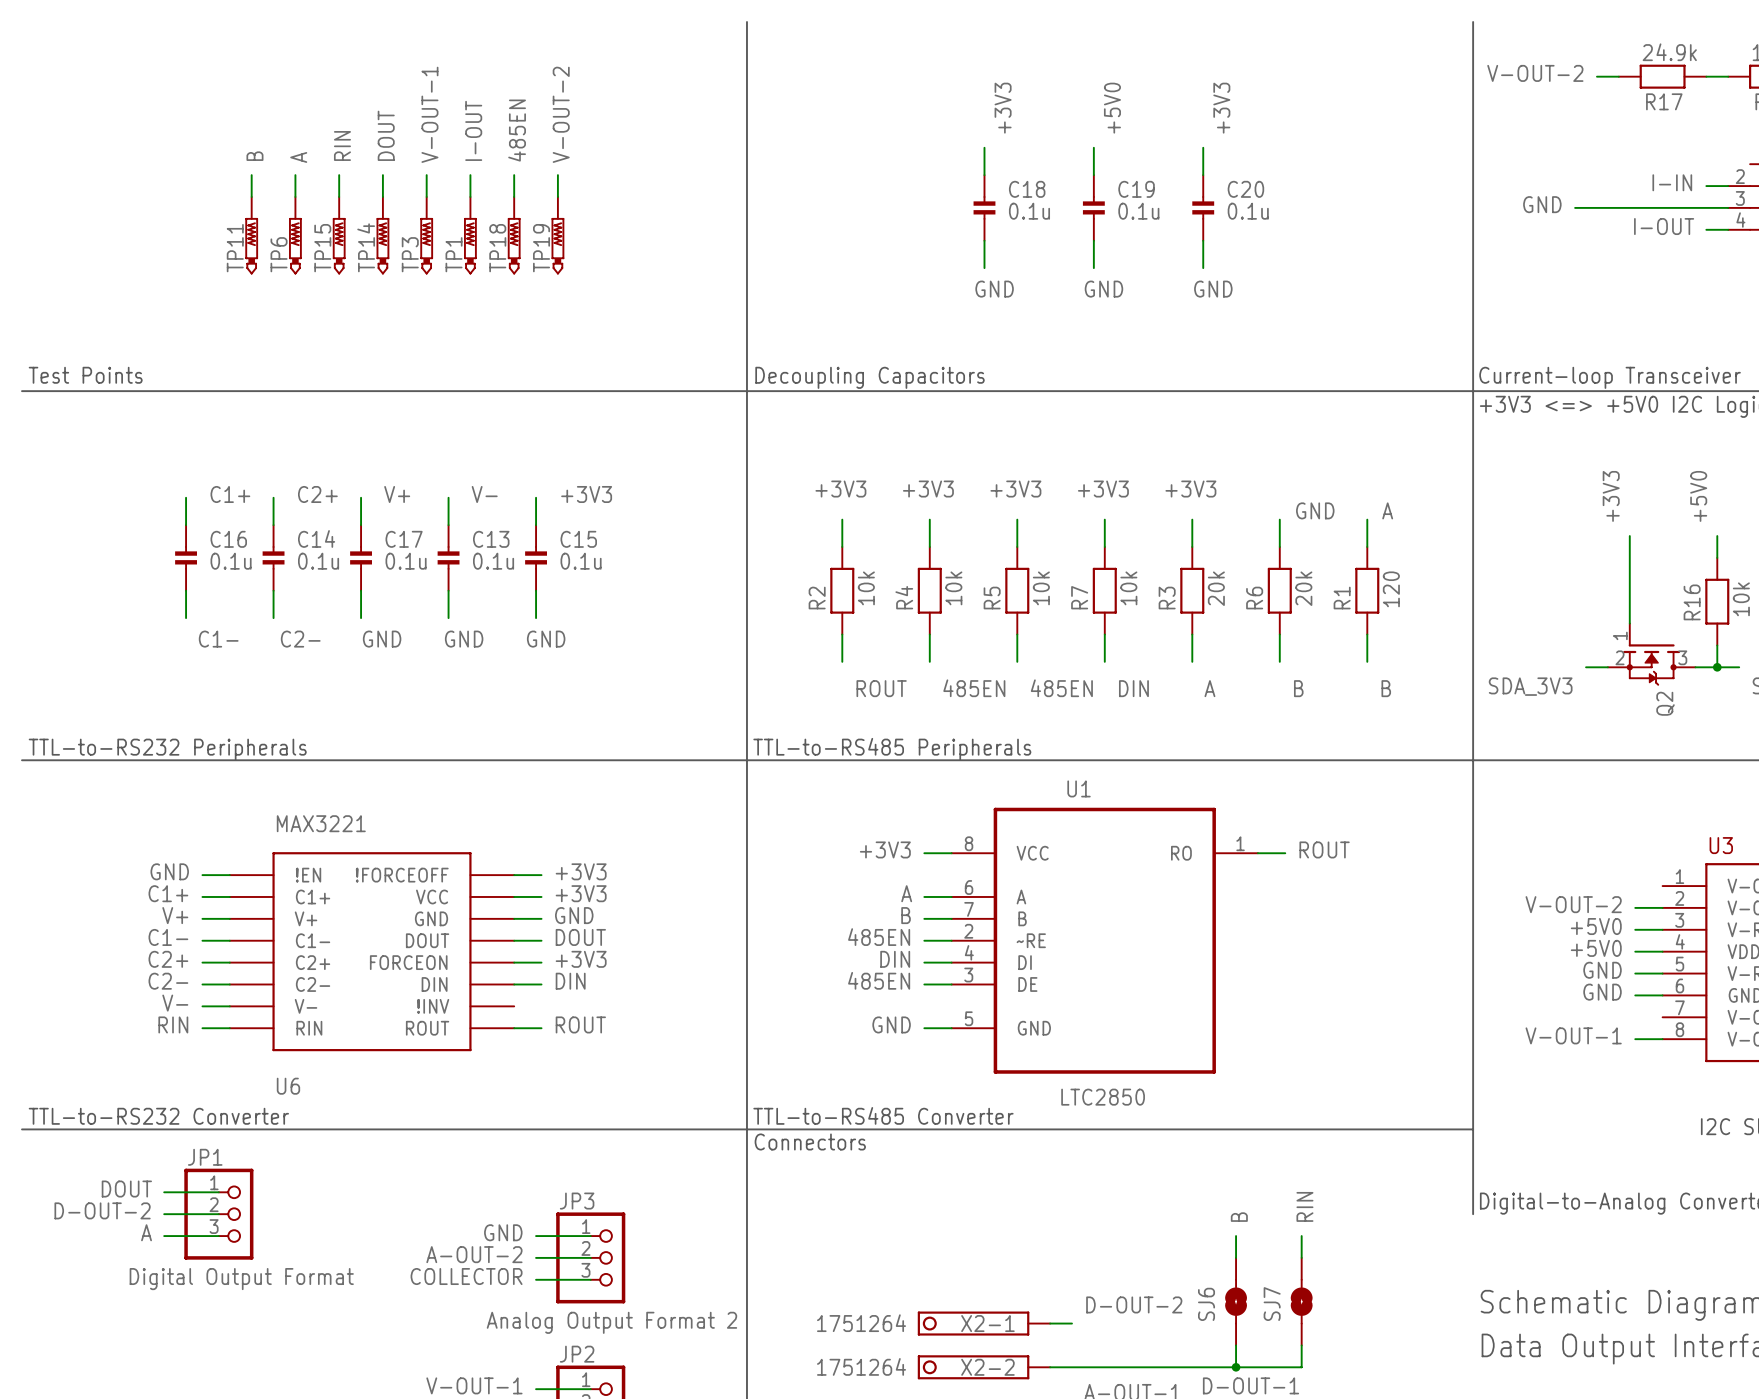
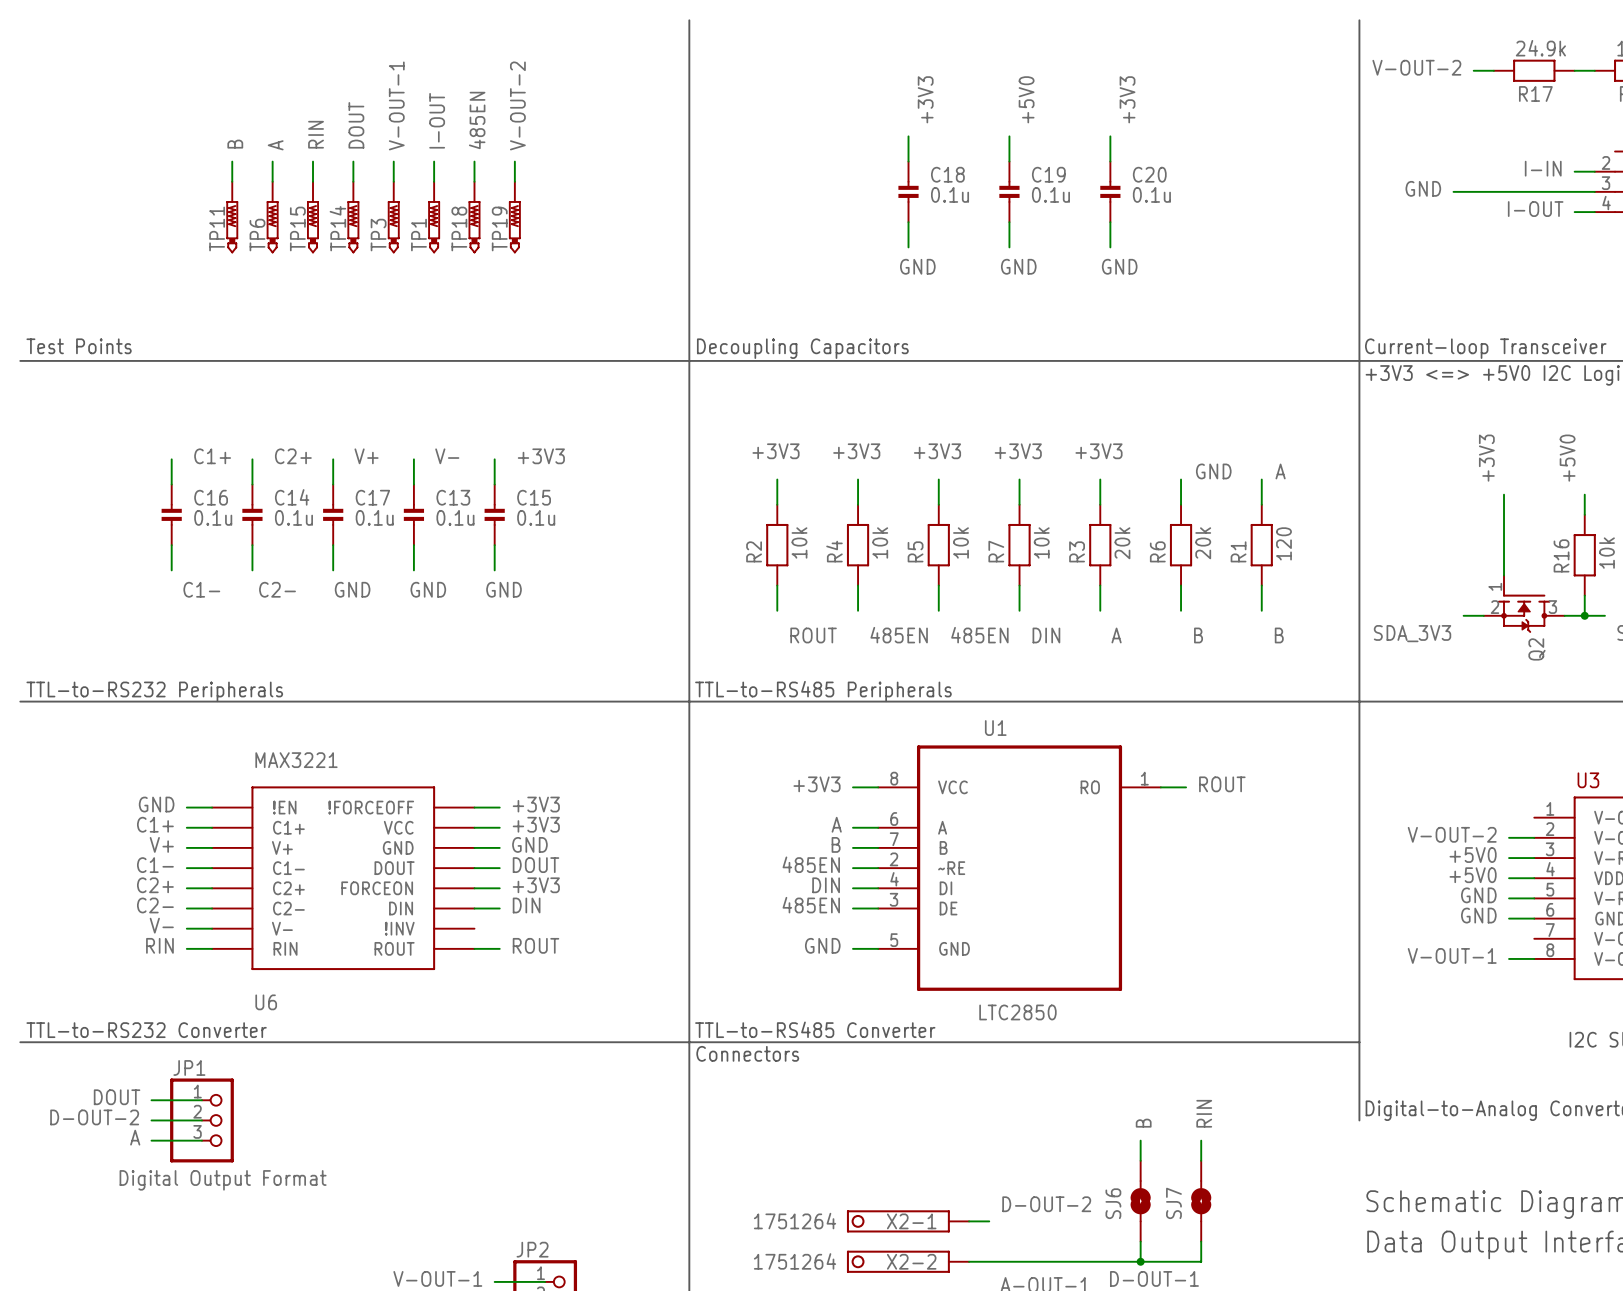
label: GND (503, 1232) -> none
wire: (536, 1236) (590, 1236) -> none
label: A-OUT-2 (474, 1254) -> none
wire: (536, 1257) (590, 1257) -> none
JP3: Analog Output Format 2 (590, 1257) -> none
label: COLLECTOR (466, 1276) -> none
wire: (536, 1279) (590, 1279) -> none

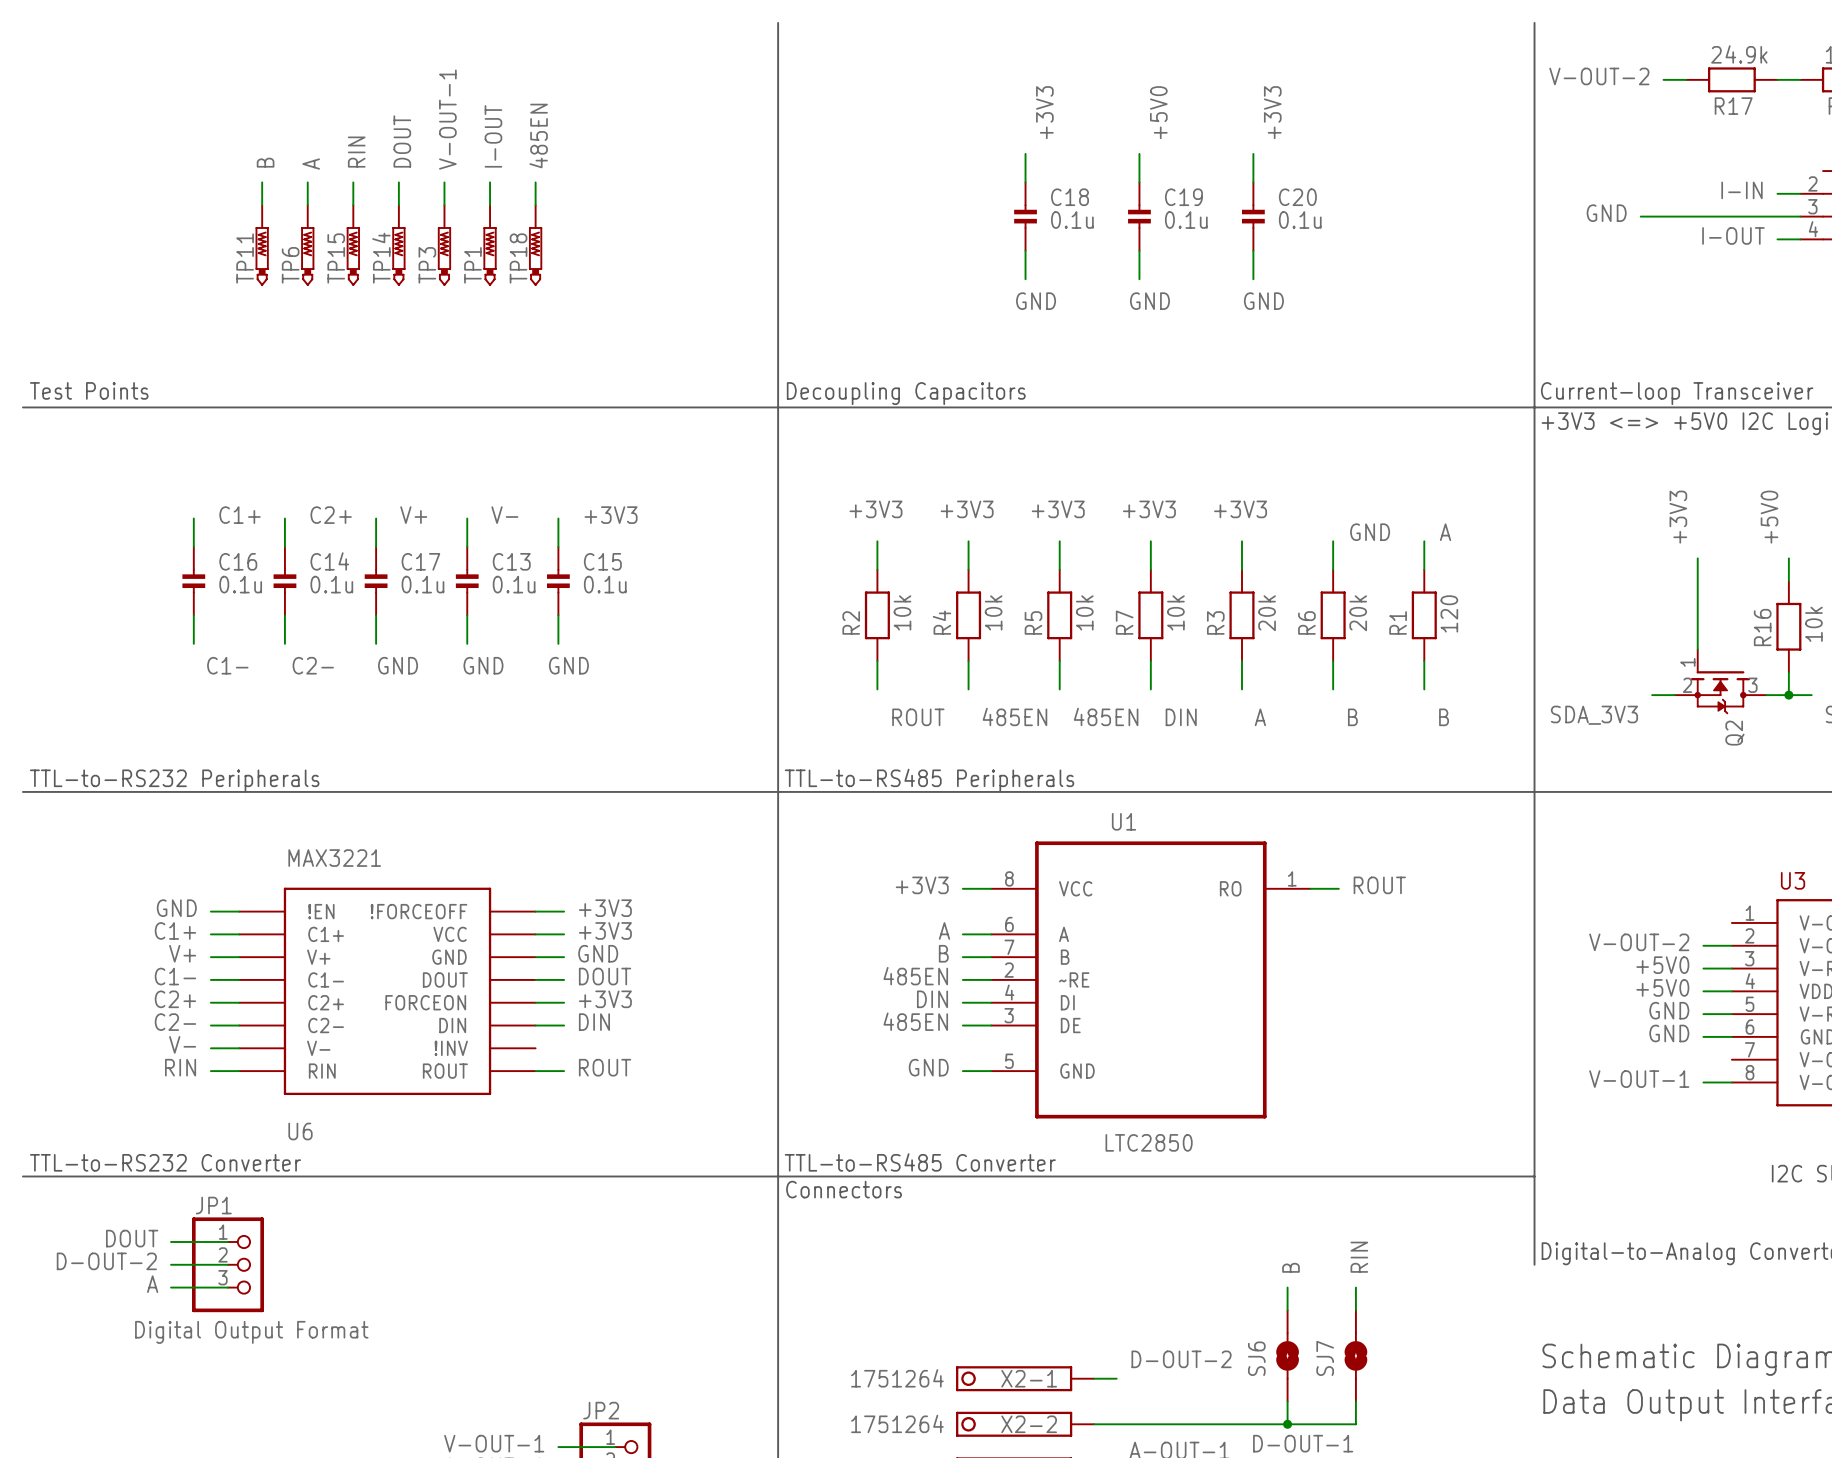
label: V-OUT-2 (517, 105) -> none
wire: (514, 161) (514, 181) -> none
TP19: (514, 217) -> none

